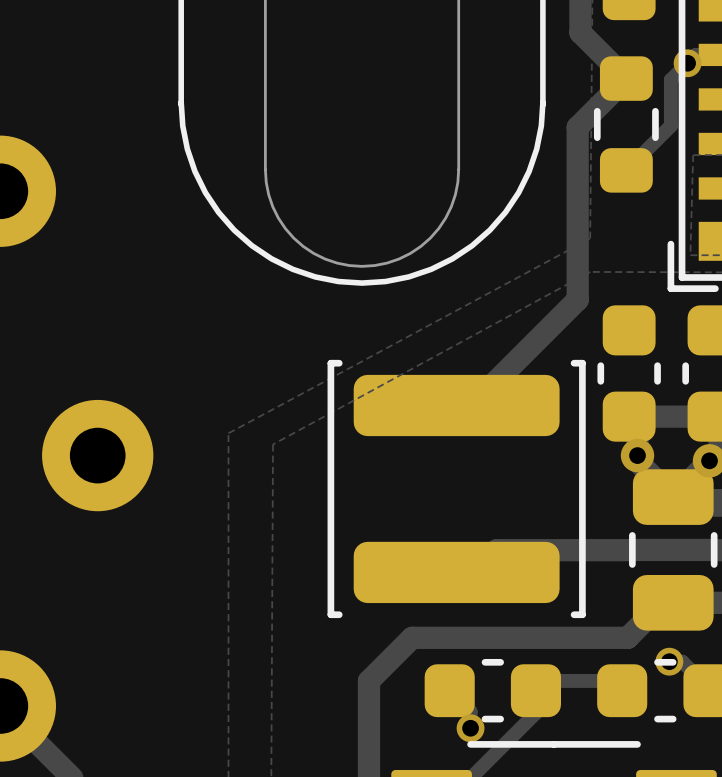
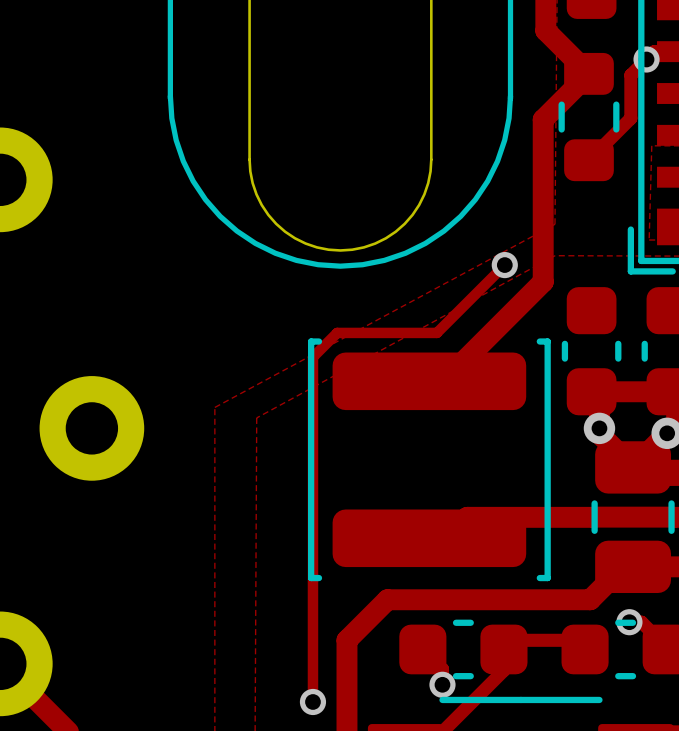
track: none -> (504, 265) (436, 332) (337, 332) (312, 357) (312, 701)
via: none -> (504, 265)
via: none -> (312, 701)

